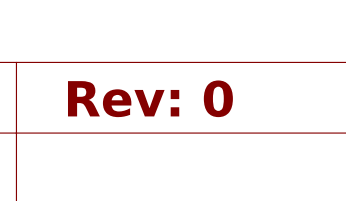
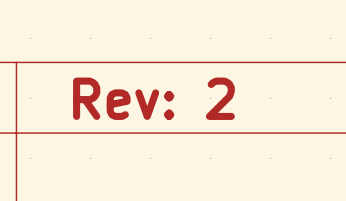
title block: Rev: 0 (150, 98) -> Rev: 2 (153, 98)

